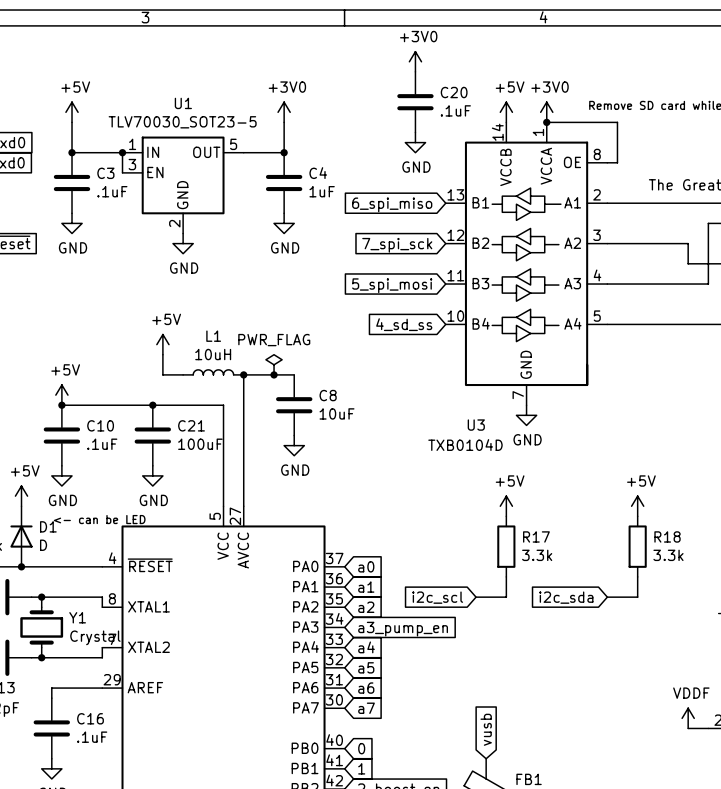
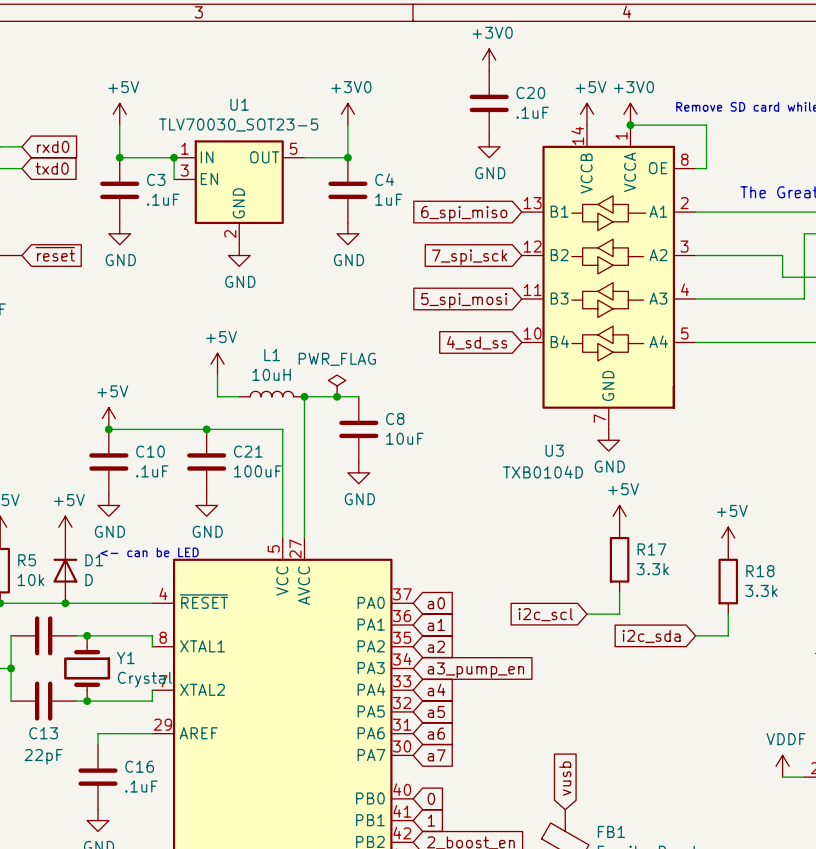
power symbol position: +5V (506, 506) -> +5V (619, 516)
R17 position: (506, 546) -> (619, 559)
wire: (506, 576) (506, 597) (476, 597) -> (587, 614) (619, 614) (619, 592)
global label position: i2c_scl (437, 597) -> i2c_scl (545, 614)

